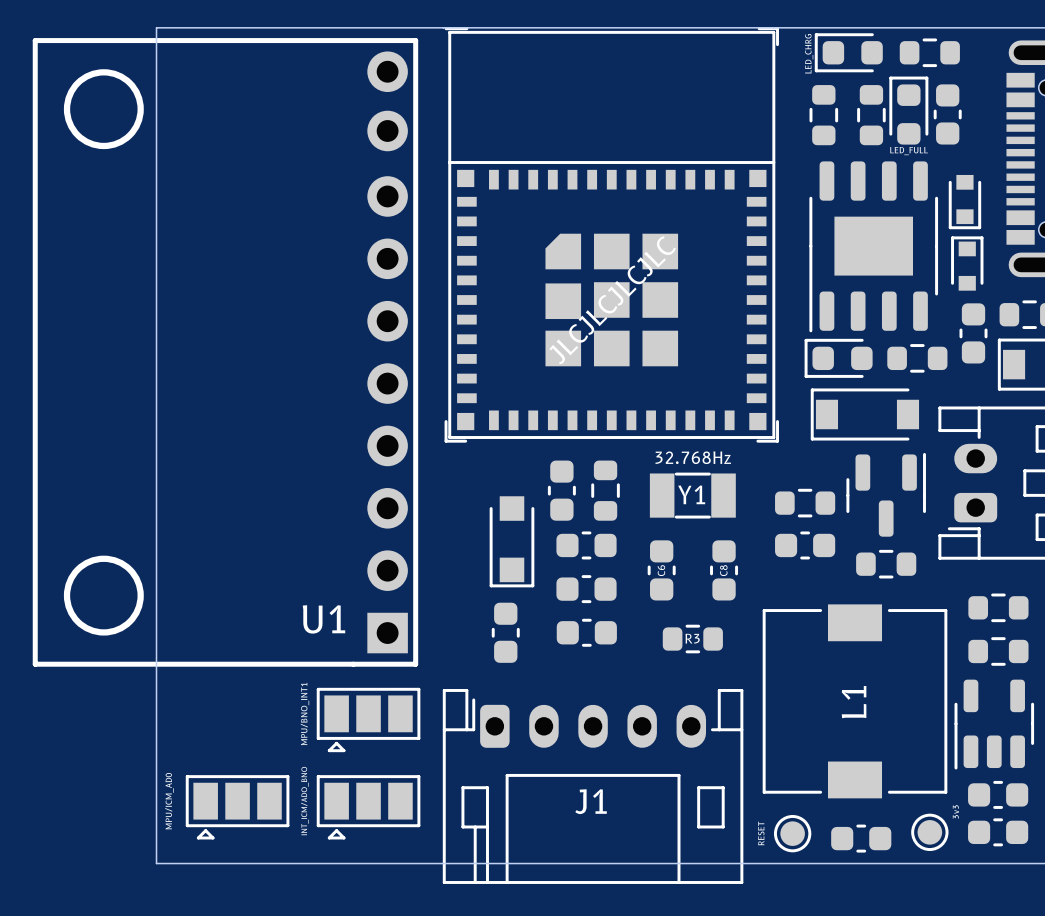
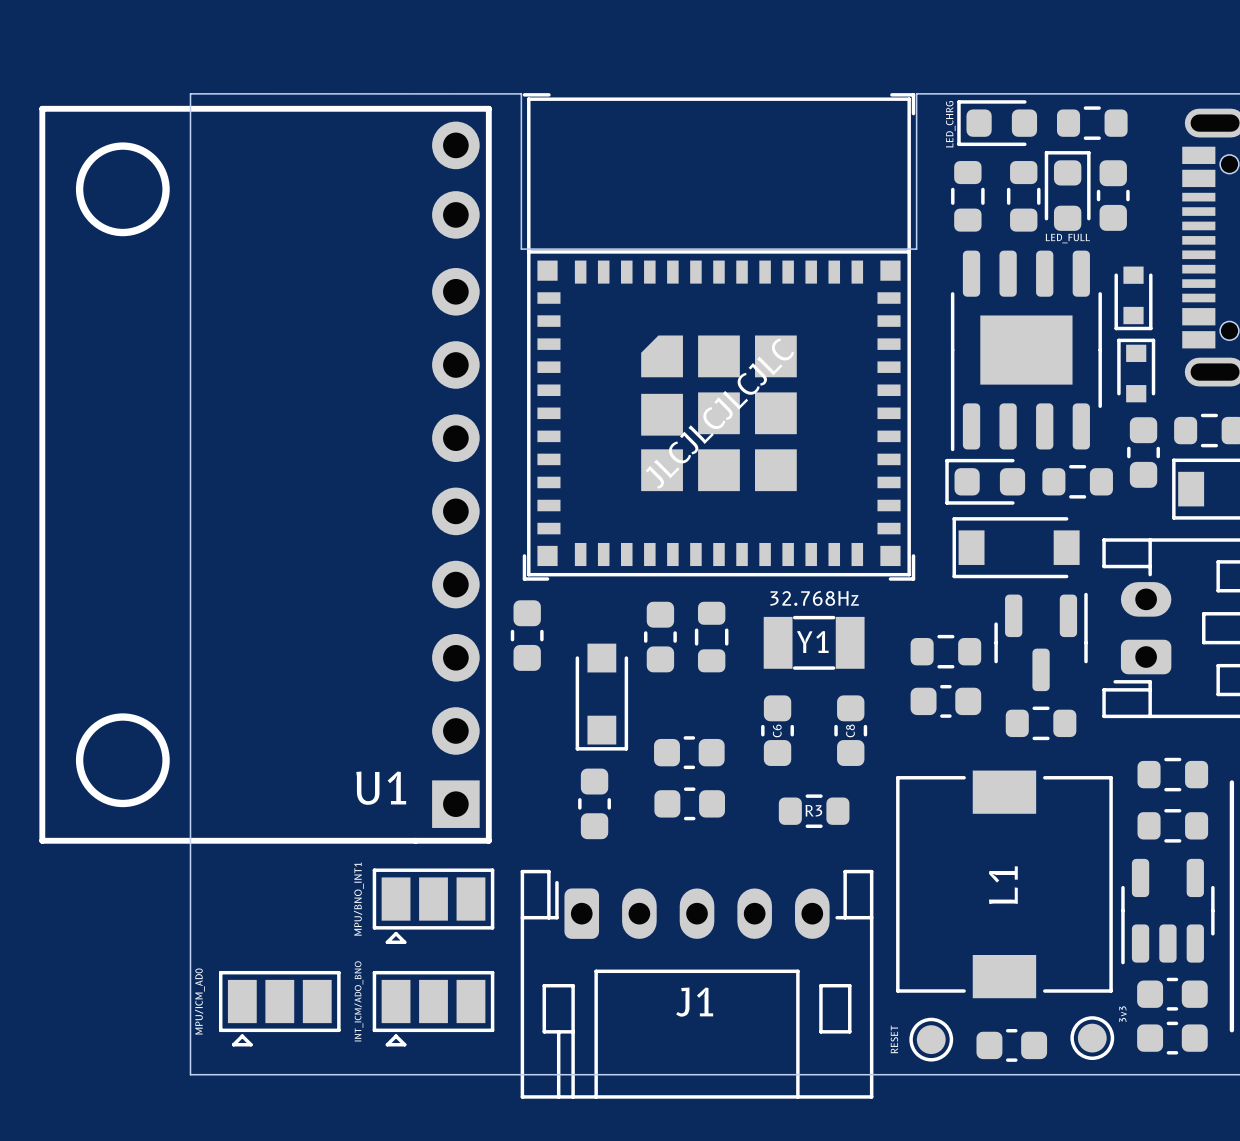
board edge: (780, 27) (156, 27) (156, 863) (161, 863) -> (916, 93) (916, 249) (521, 249) (521, 93) (190, 93) (190, 1074)
part rotation: 0° (586, 545) -> 90° clockwise (527, 635)
part position: (586, 545) -> (527, 635)

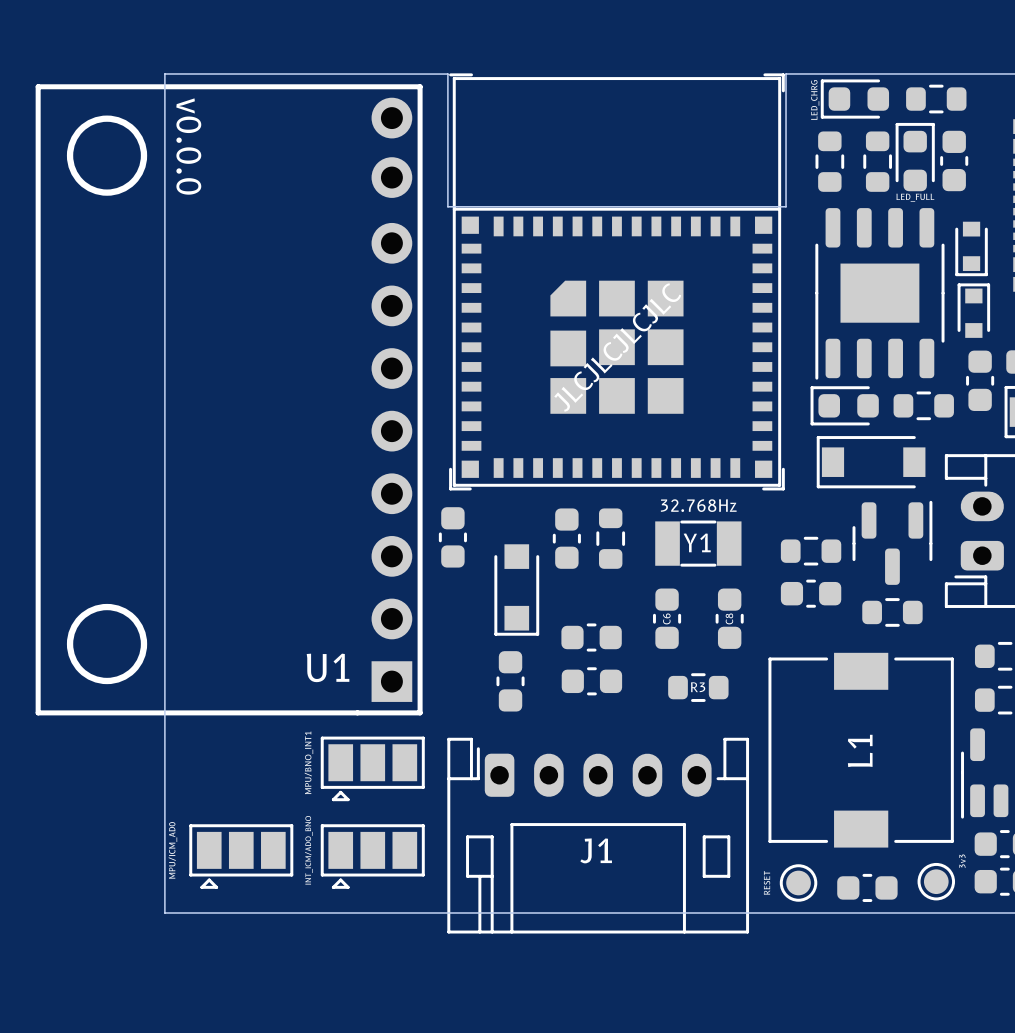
text: none -> v0.0.0 (188, 146)

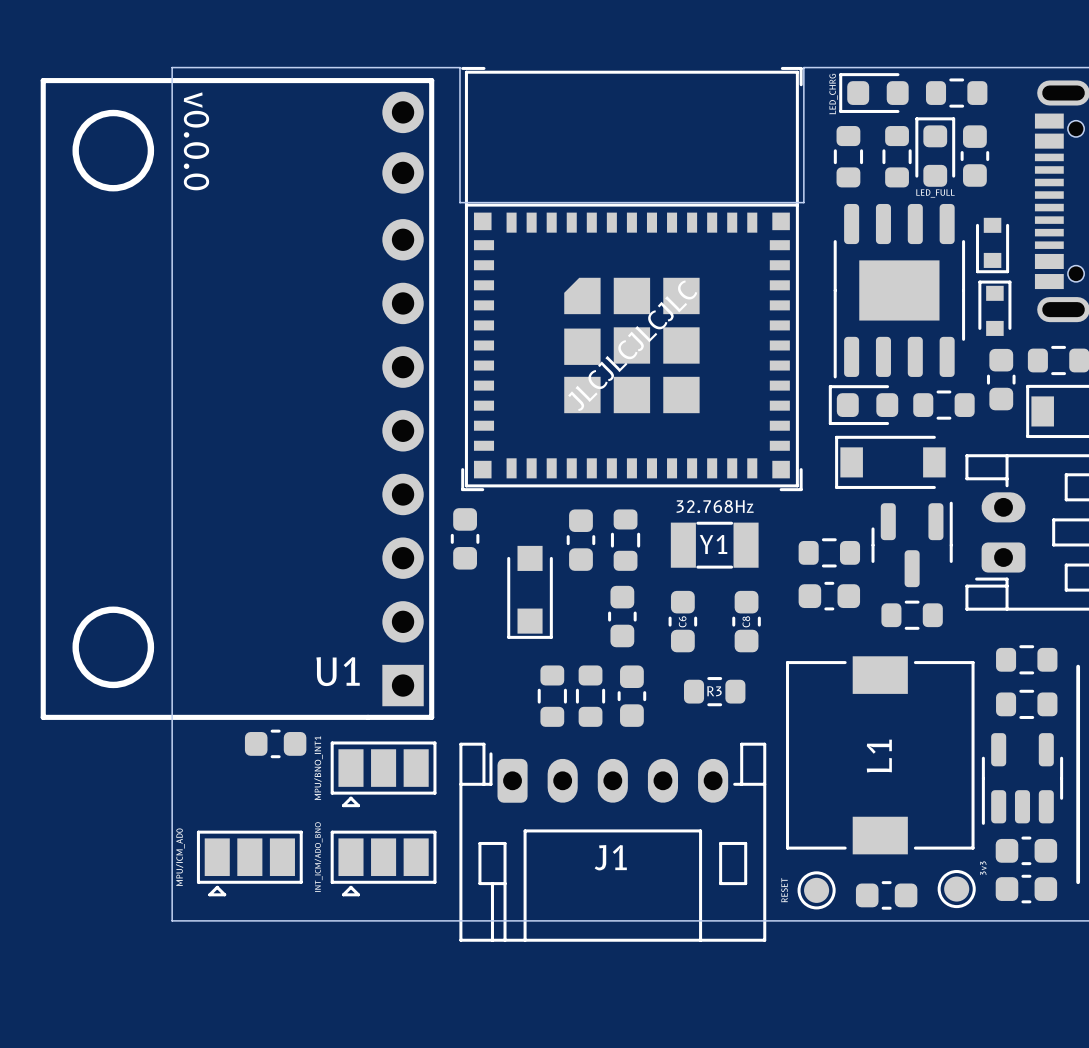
part rotation: 0° (591, 637) -> 90° clockwise (622, 616)
part: (510, 681) -> none
part rotation: 0° (591, 681) -> 90° clockwise (631, 696)
part: none -> (552, 696)
part: none -> (590, 696)
part: none -> (275, 743)

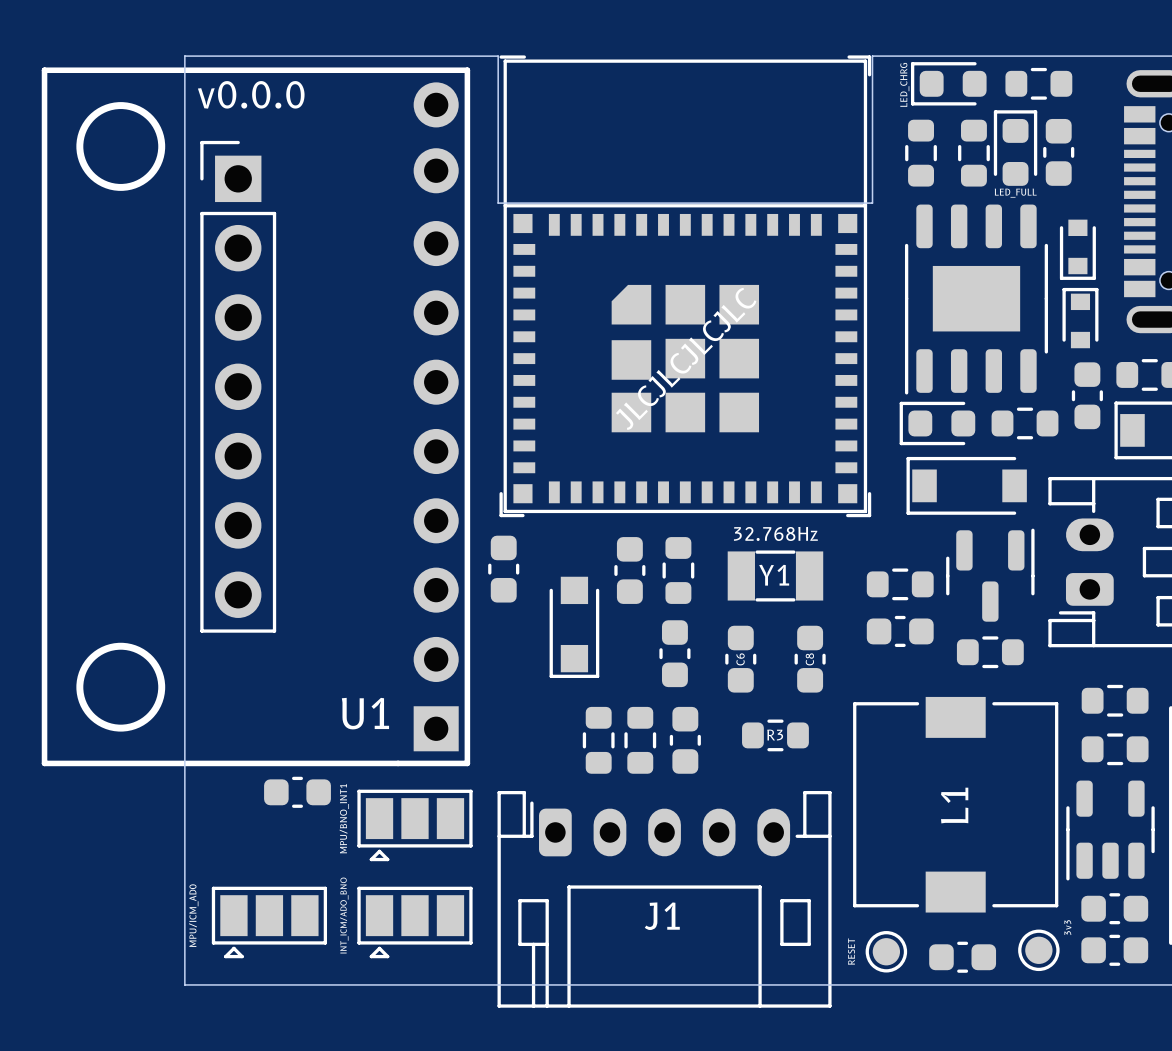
text rotation: 0° (196, 141) -> 90° counterclockwise (251, 94)
part: none -> (238, 386)

